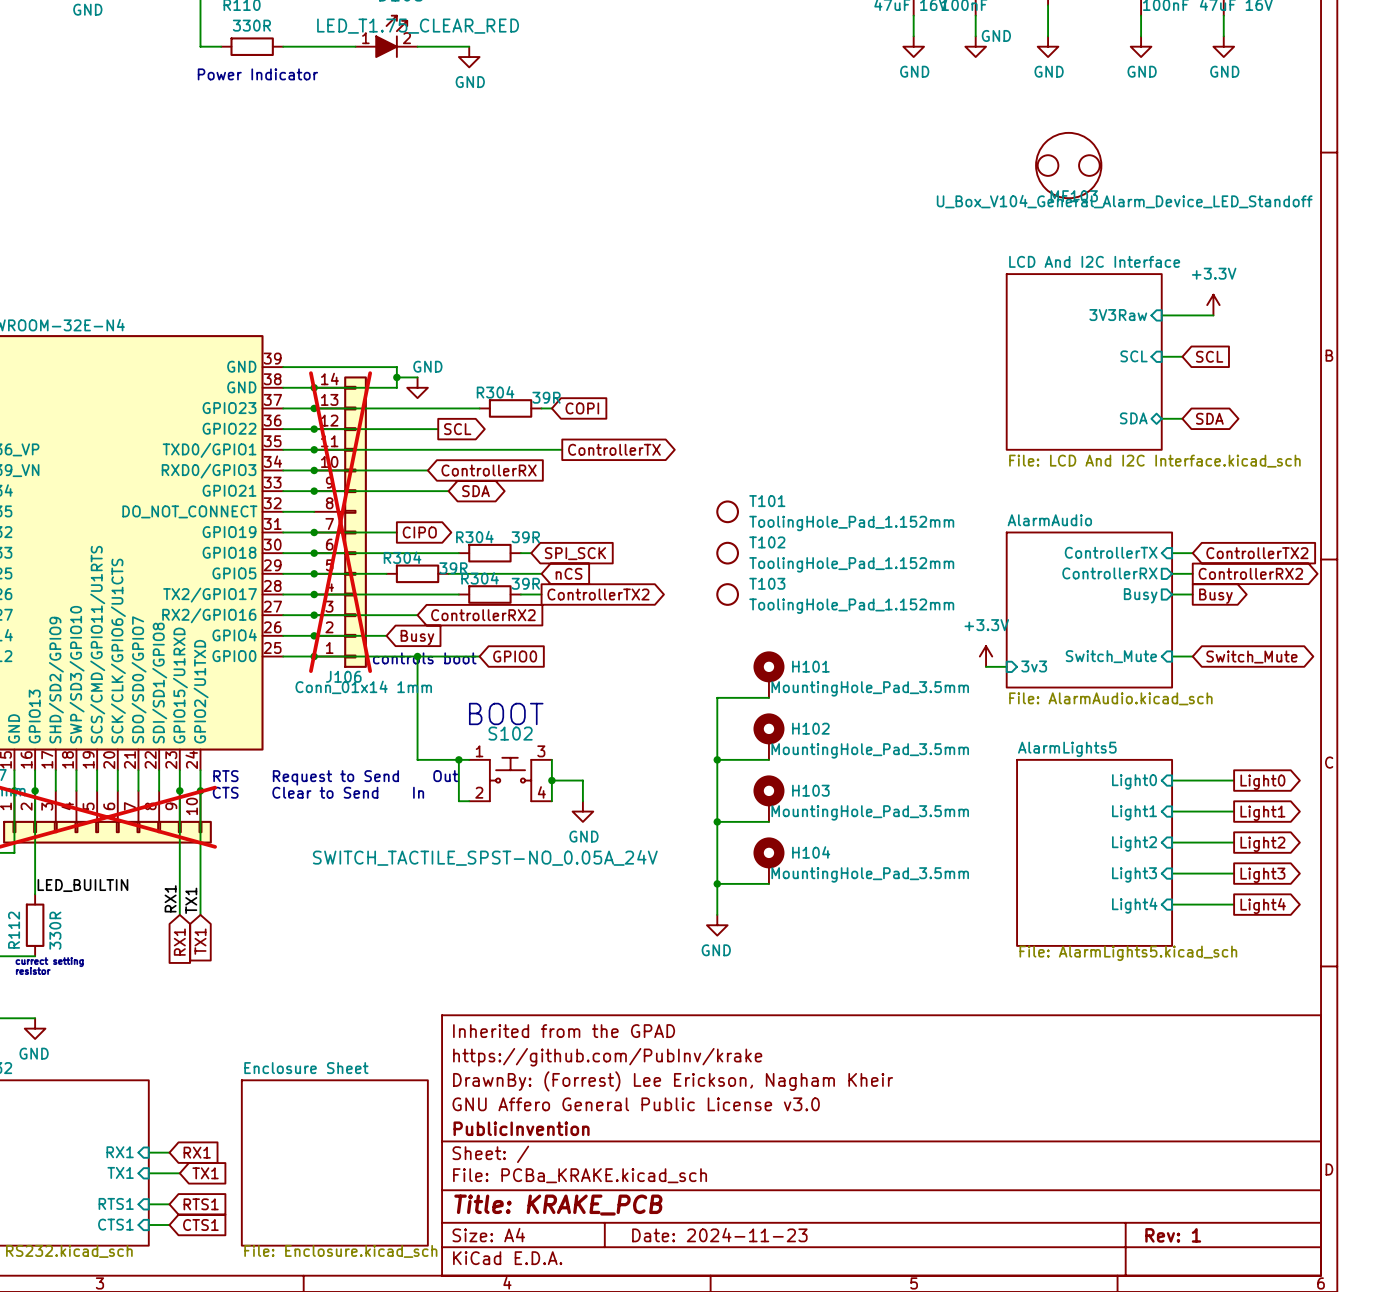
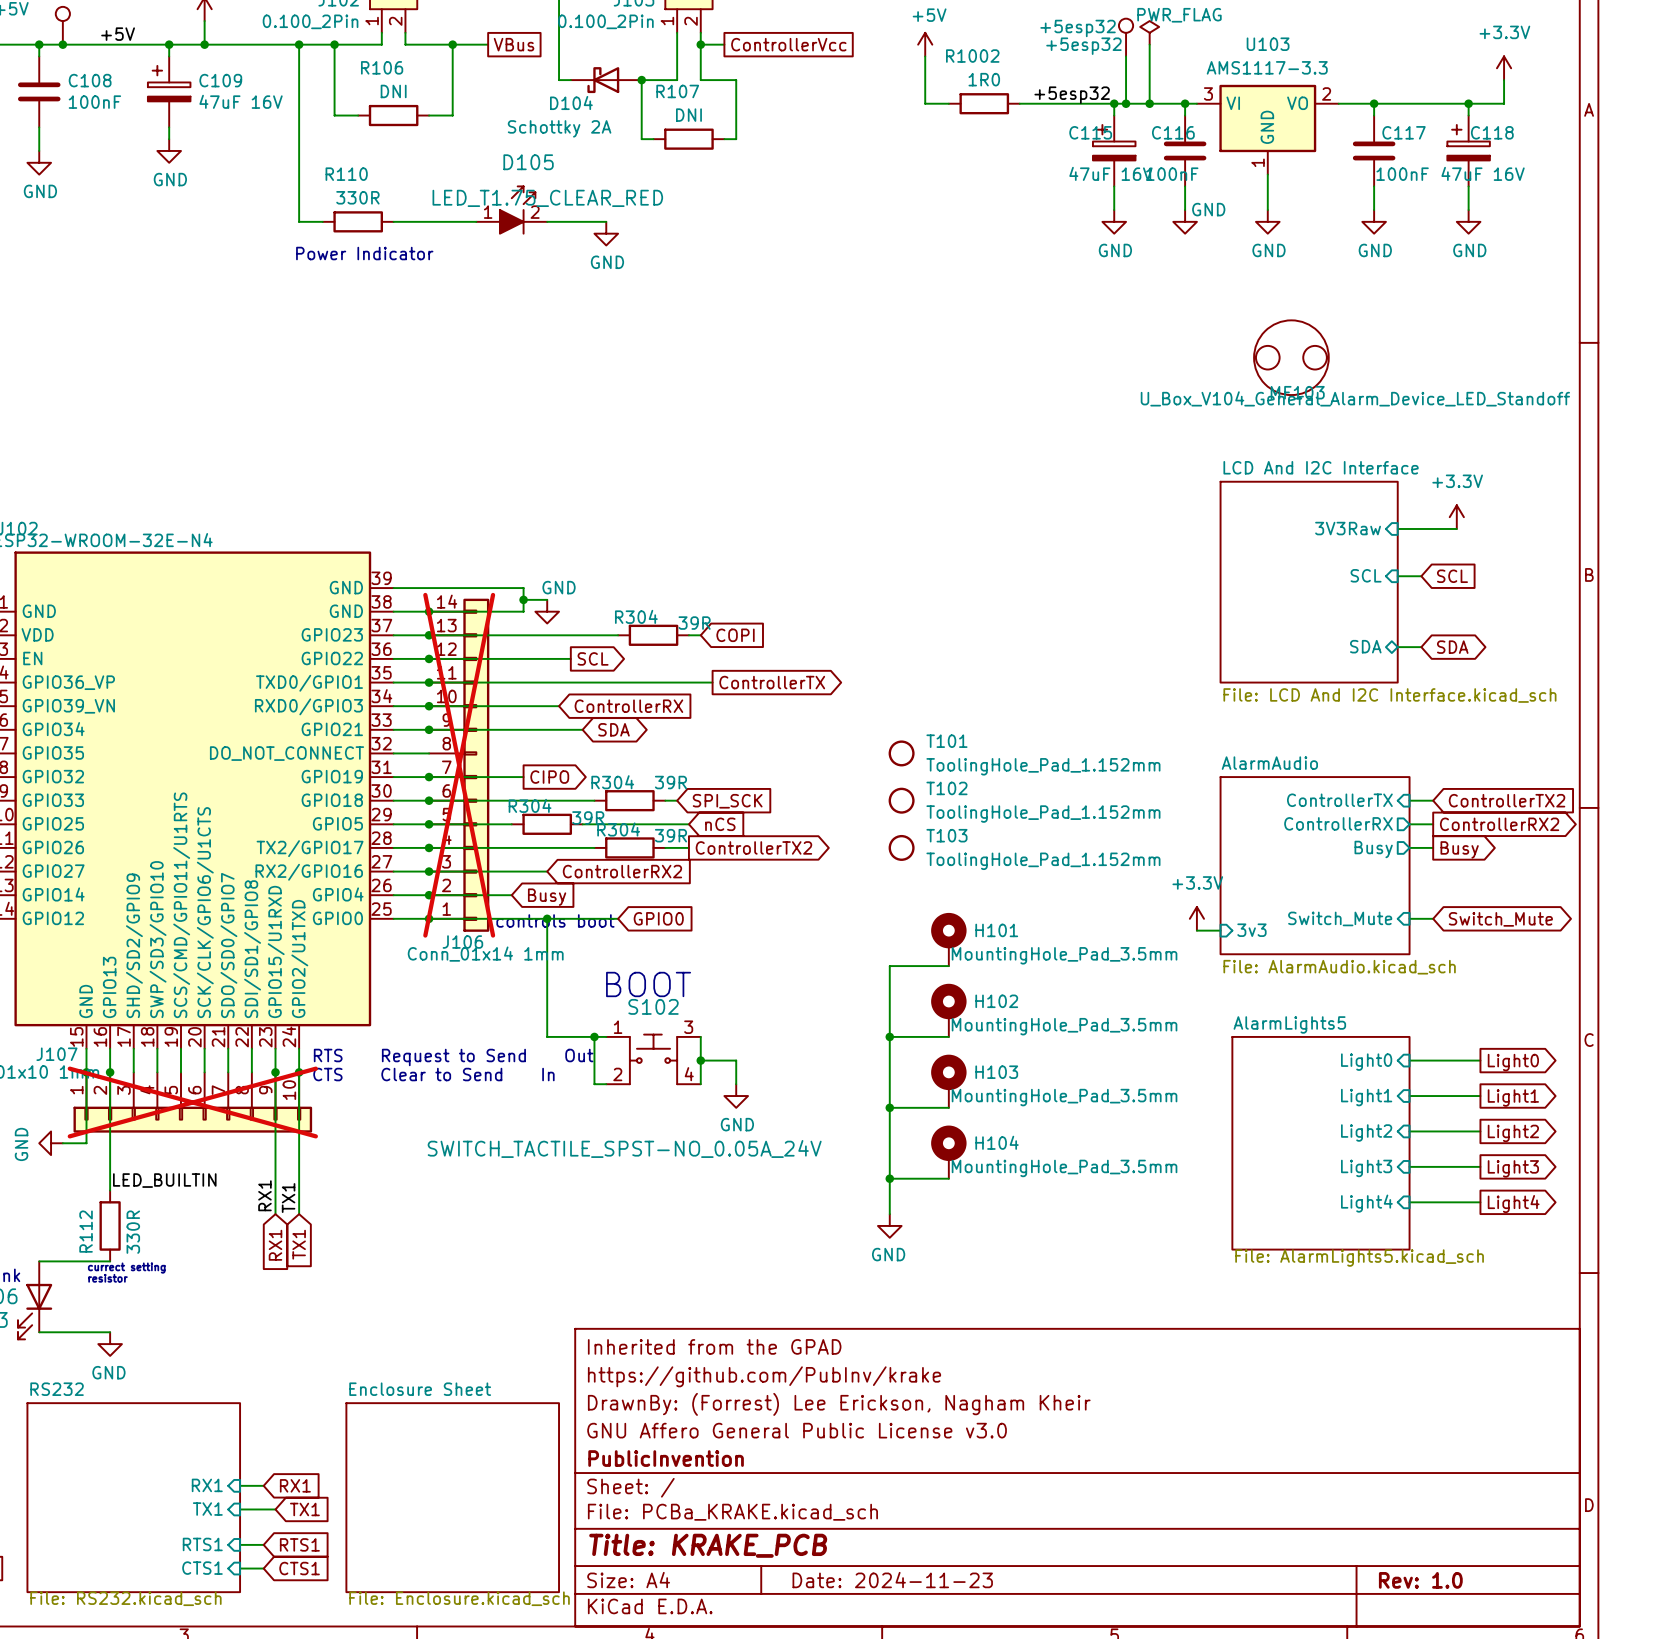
title block: Rev: 1 (1173, 1235) -> Rev: 1.0 (1420, 1580)

